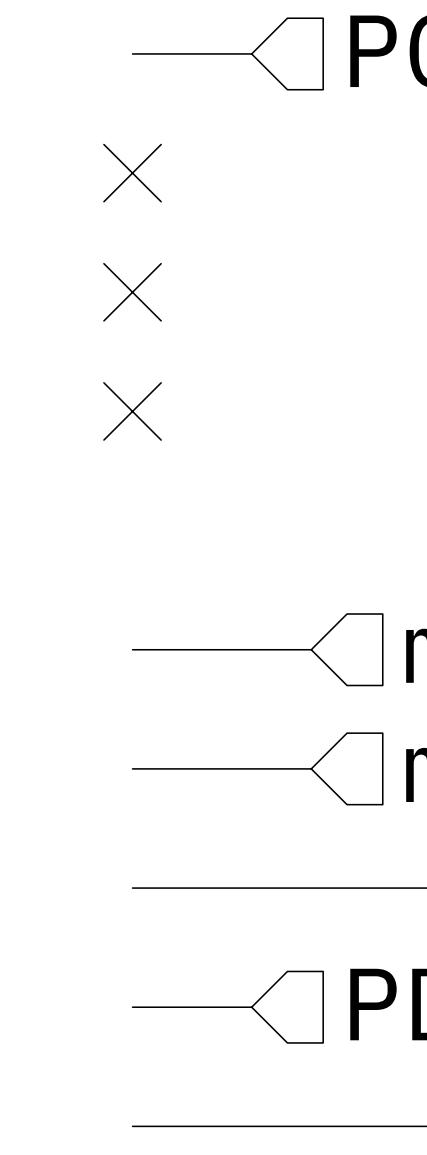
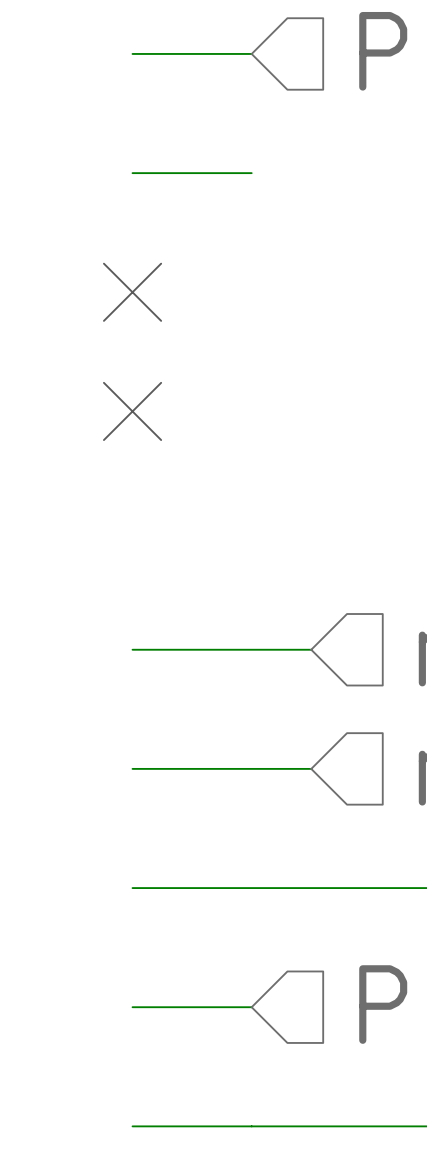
wire: none -> (132, 173) (251, 173)
no-connect mark: (132, 173) -> none

